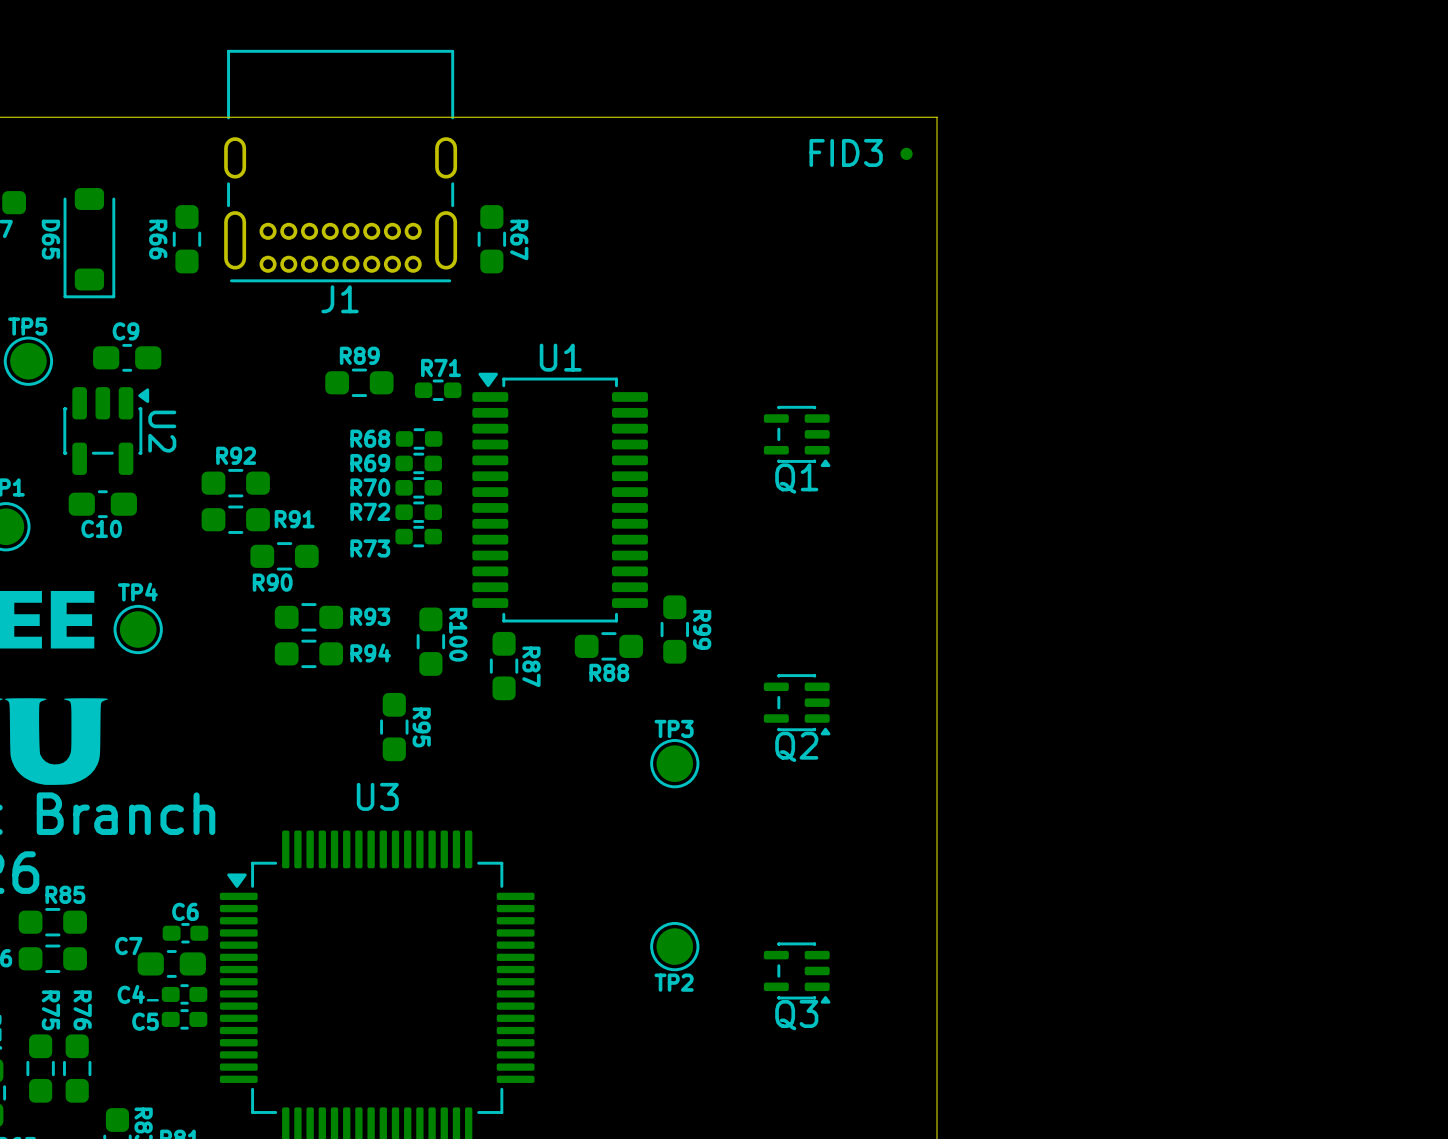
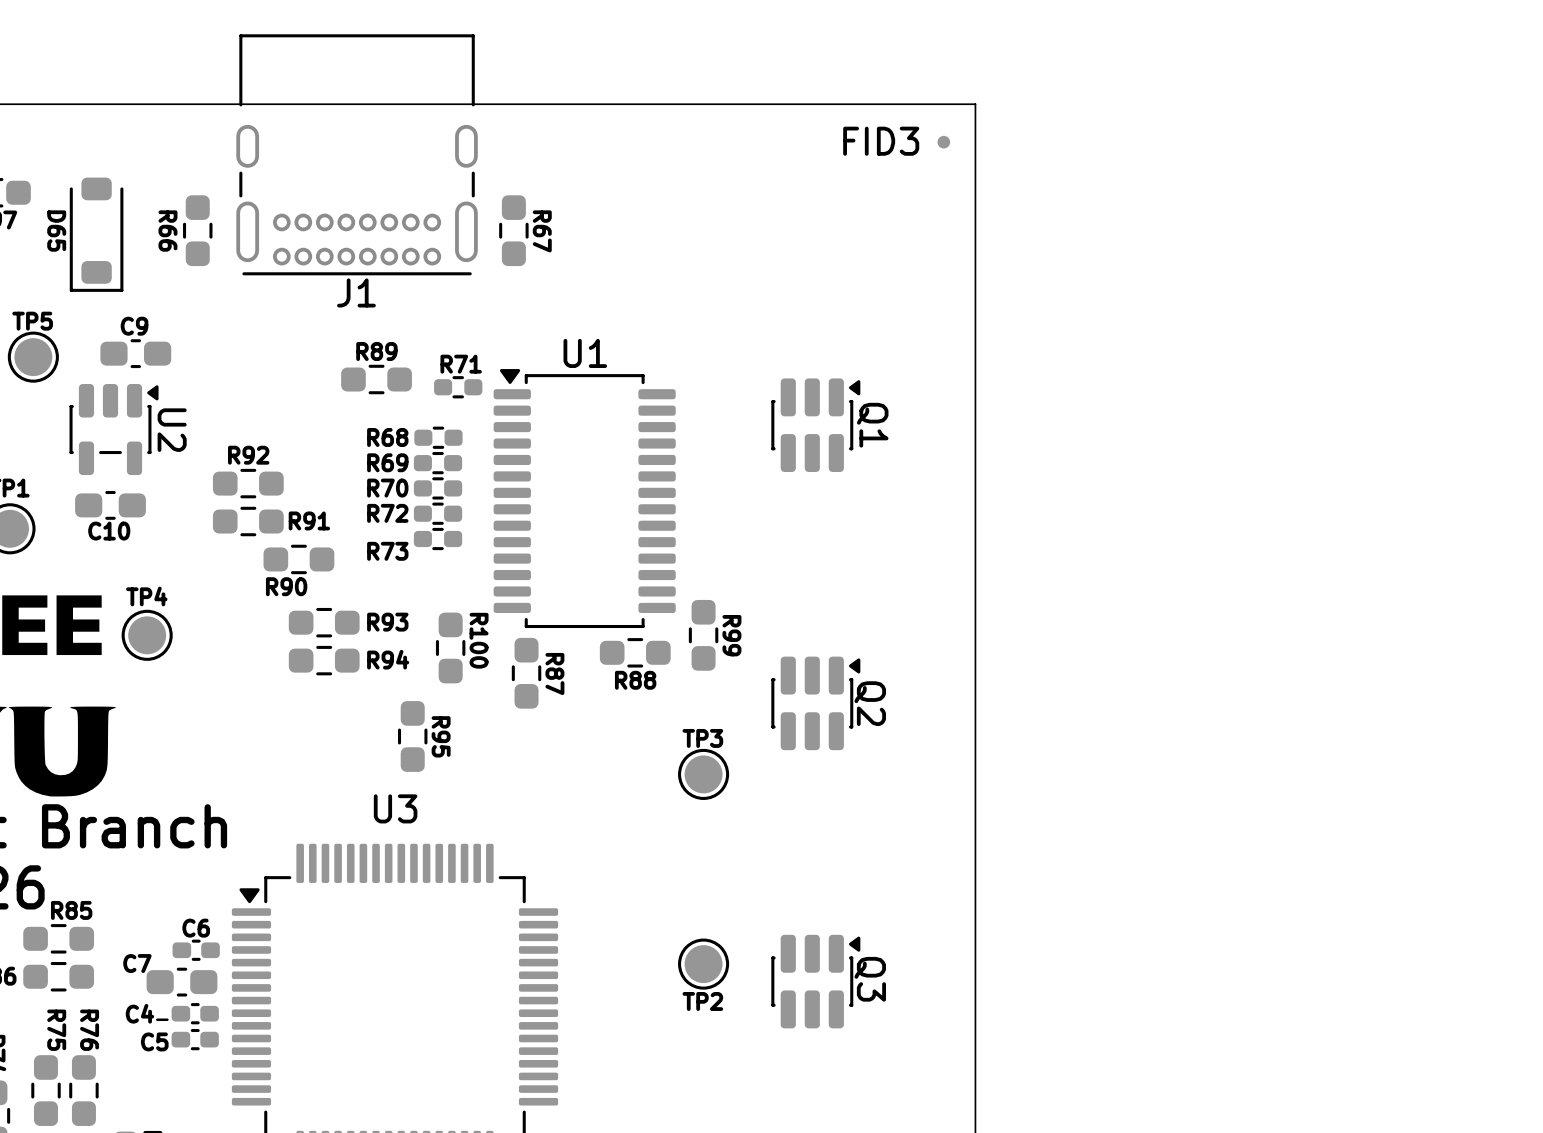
Q1 footprint: [763, 405, 831, 468] -> [771, 378, 861, 472]
Q1 name position: Q1 (796, 478) -> Q1 (872, 425)
Q2 footprint: [763, 674, 831, 736] -> [771, 656, 861, 751]
Q2 name position: Q2 (796, 746) -> Q2 (870, 703)
Q3 footprint: [763, 942, 831, 1004] -> [771, 934, 861, 1029]
Q3 name position: Q3 (796, 1015) -> Q3 (870, 979)

